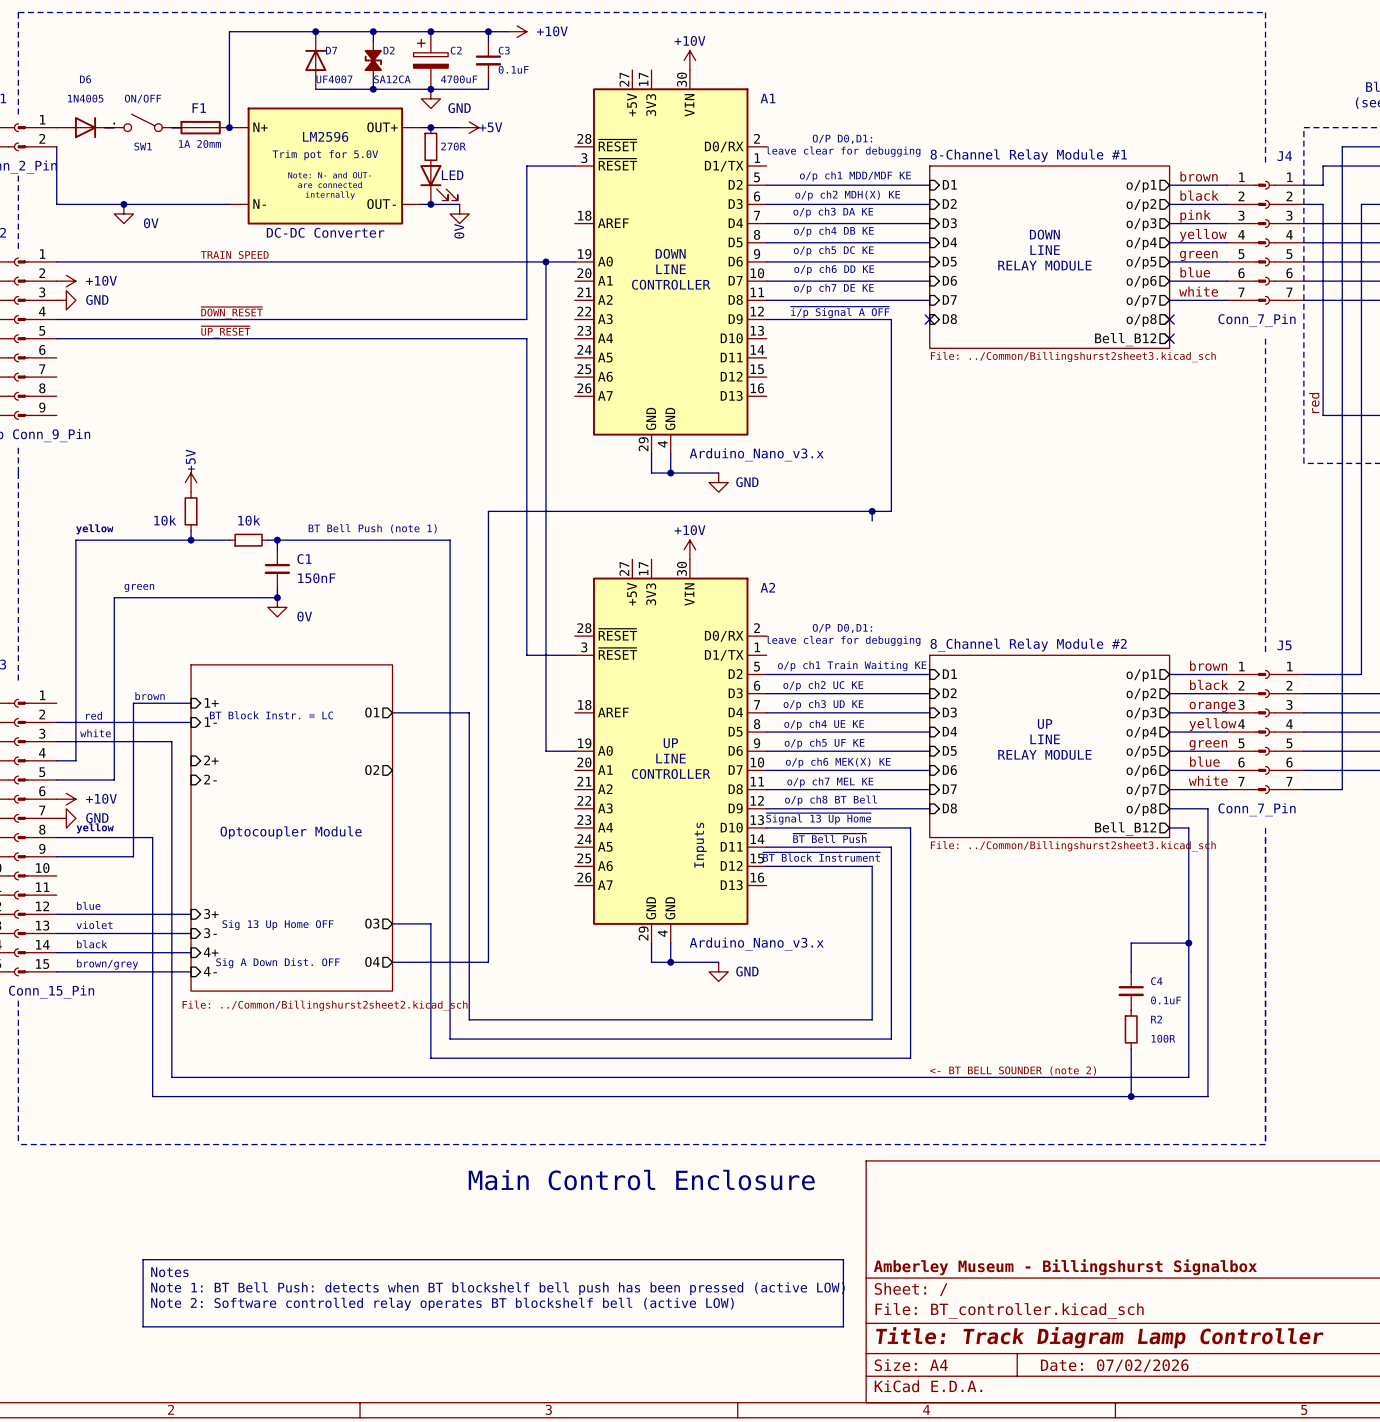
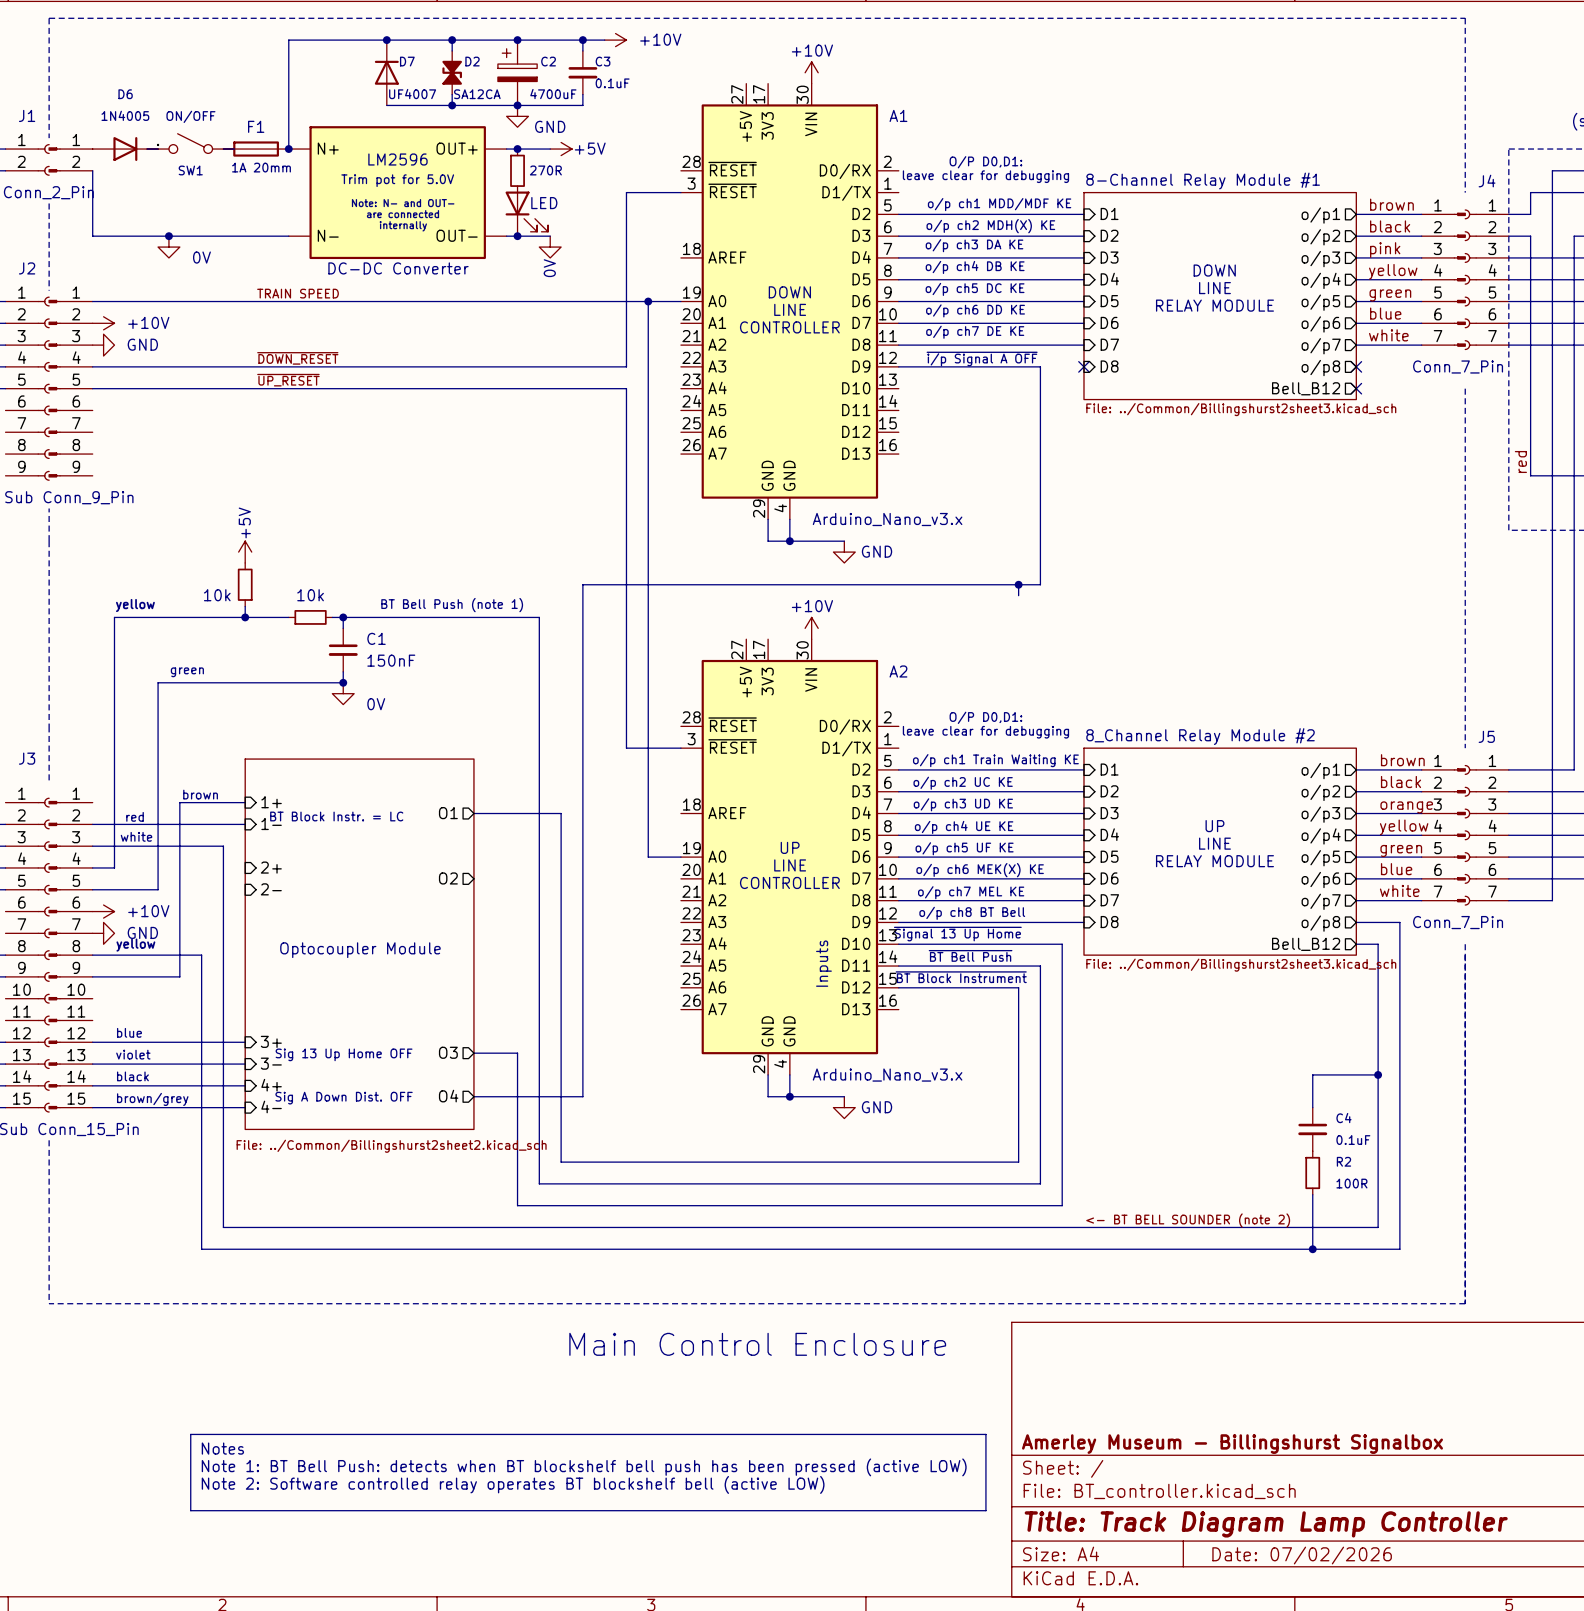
title block: Amberley Museum - Billingshurst Signalbox (1065, 1267) -> Amerley Museum - Billingshurst Signalbox (1232, 1444)

